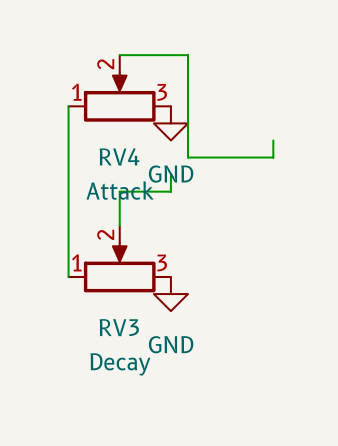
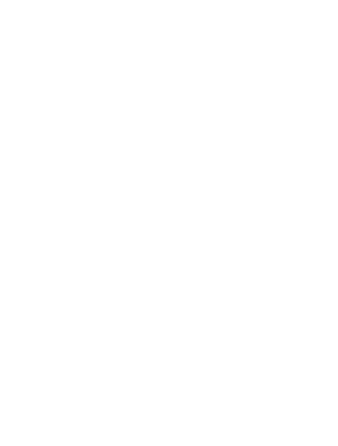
wire: (119, 55) (188, 55) (188, 157) (273, 157) (273, 140) -> none
RV4: Attack (119, 88) -> none
wire: (68, 106) (68, 276) -> none
power symbol: GND (170, 123) -> none
wire: (170, 174) (170, 191) (119, 191) (119, 225) -> none
RV3: Decay (119, 259) -> none
power symbol: GND (170, 294) -> none

